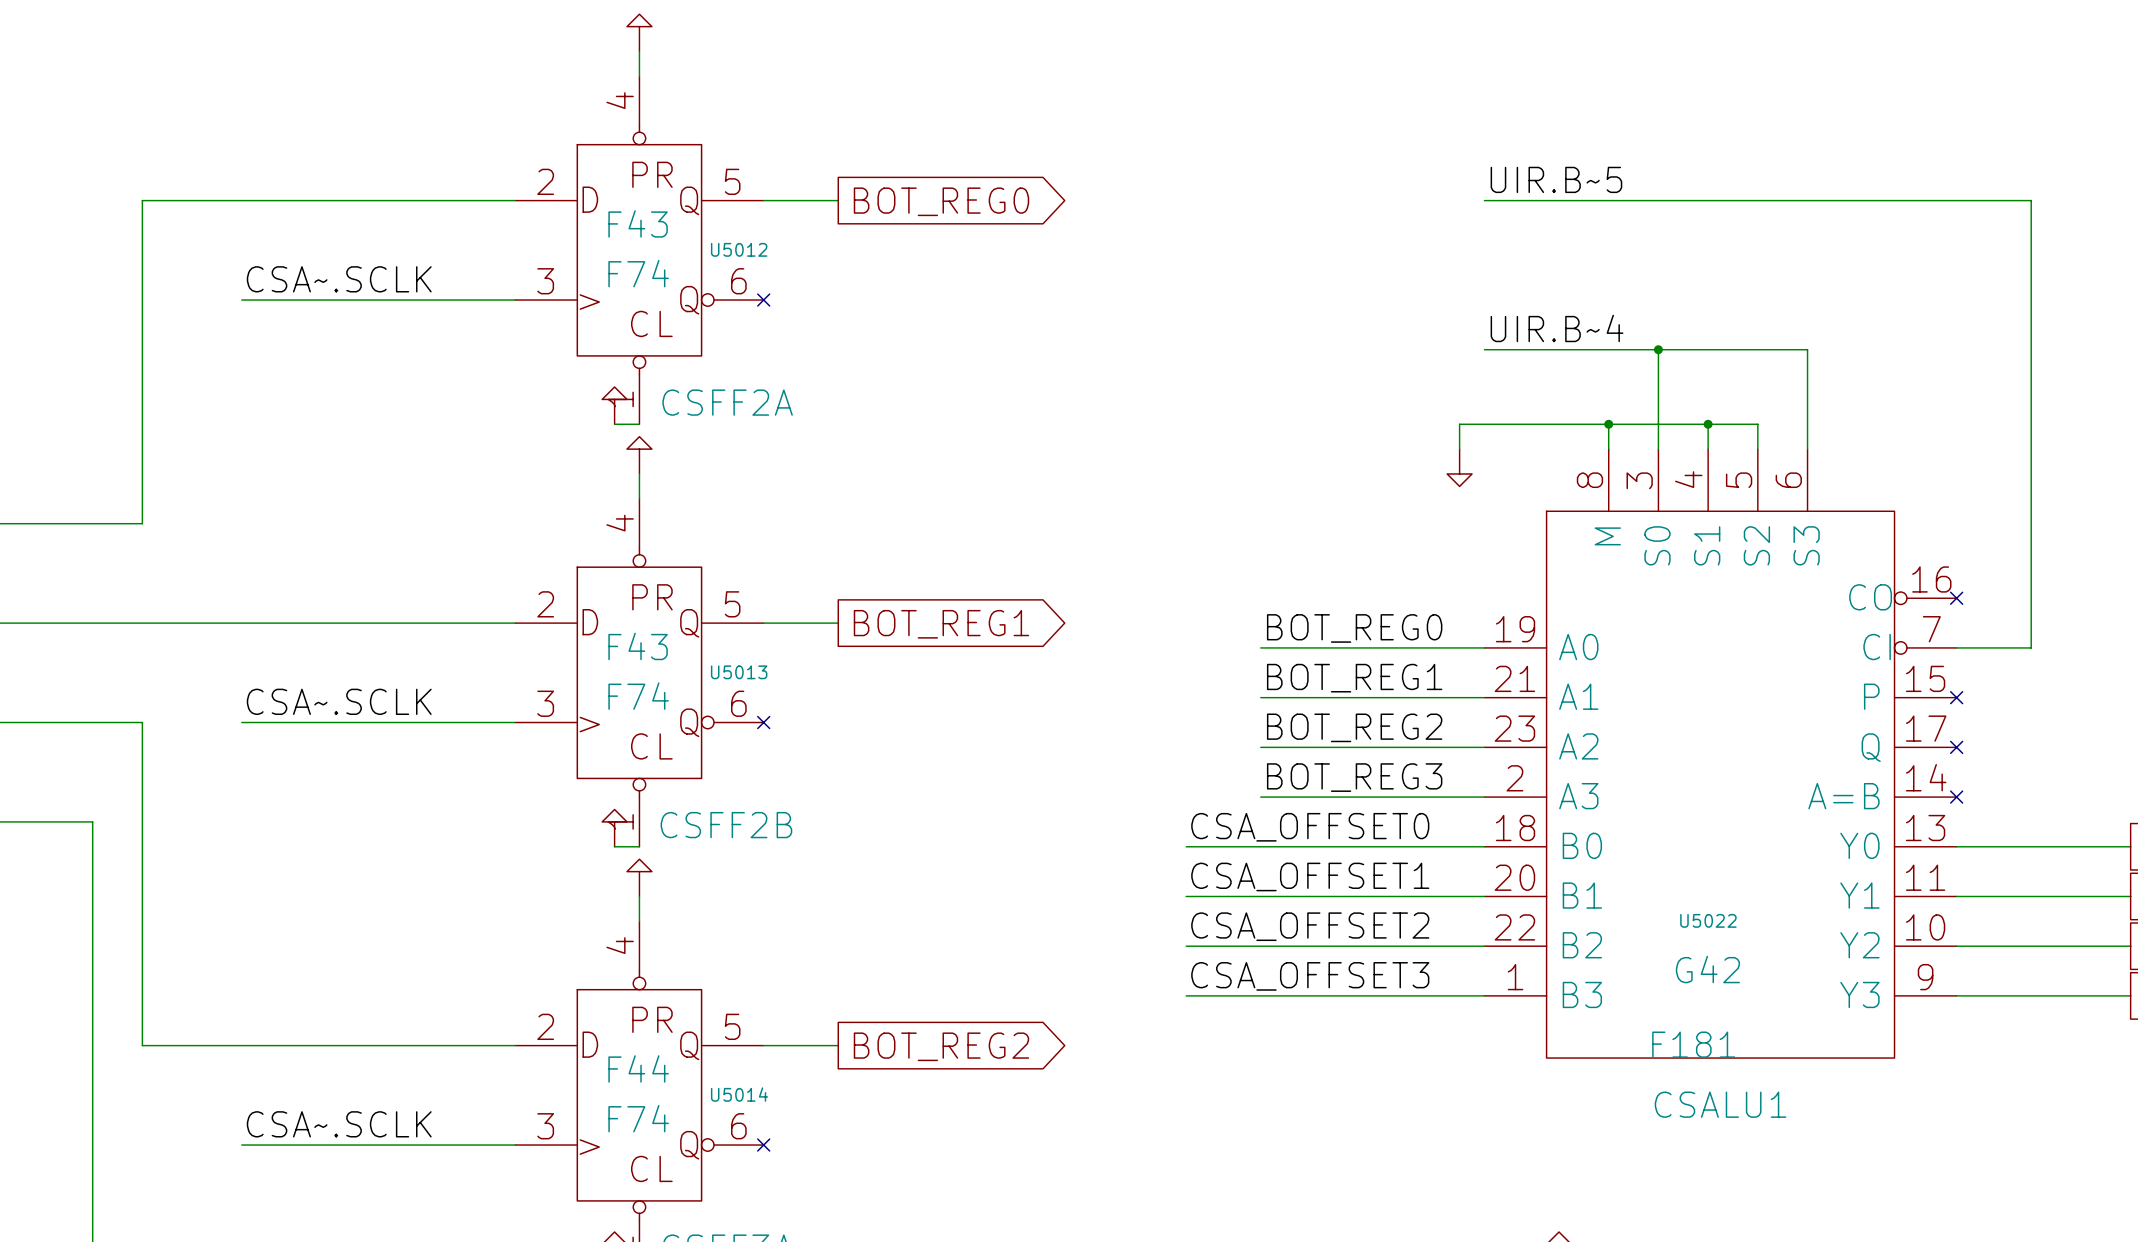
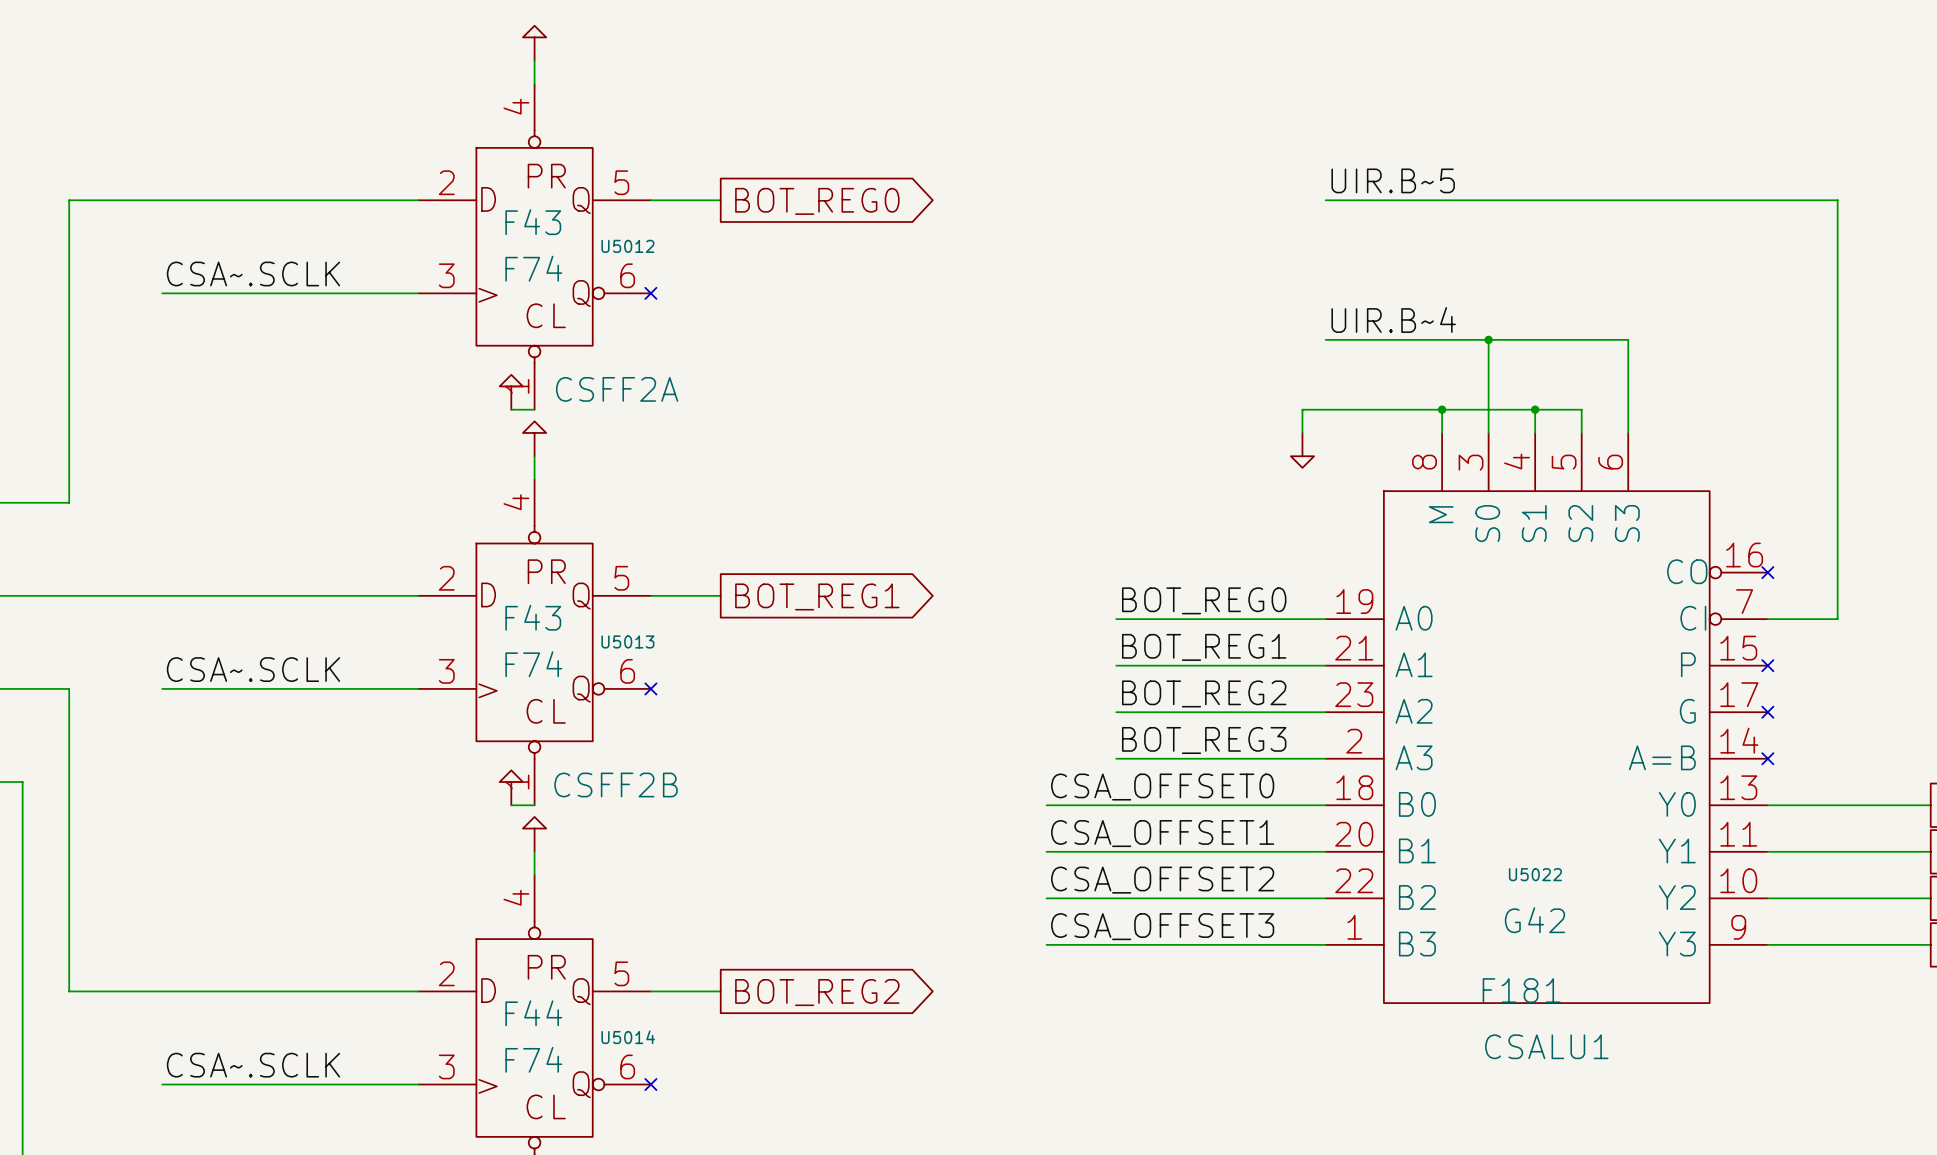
U5022 pin name: Q (1871, 747) -> G (1687, 711)

